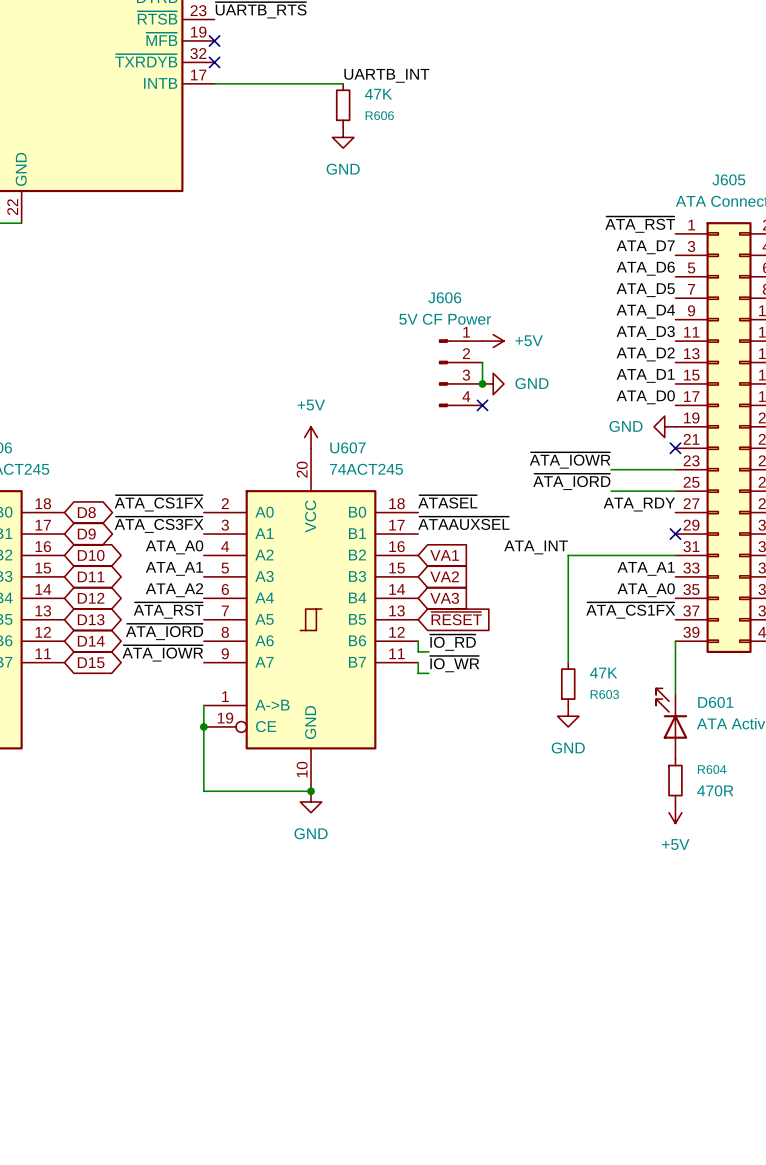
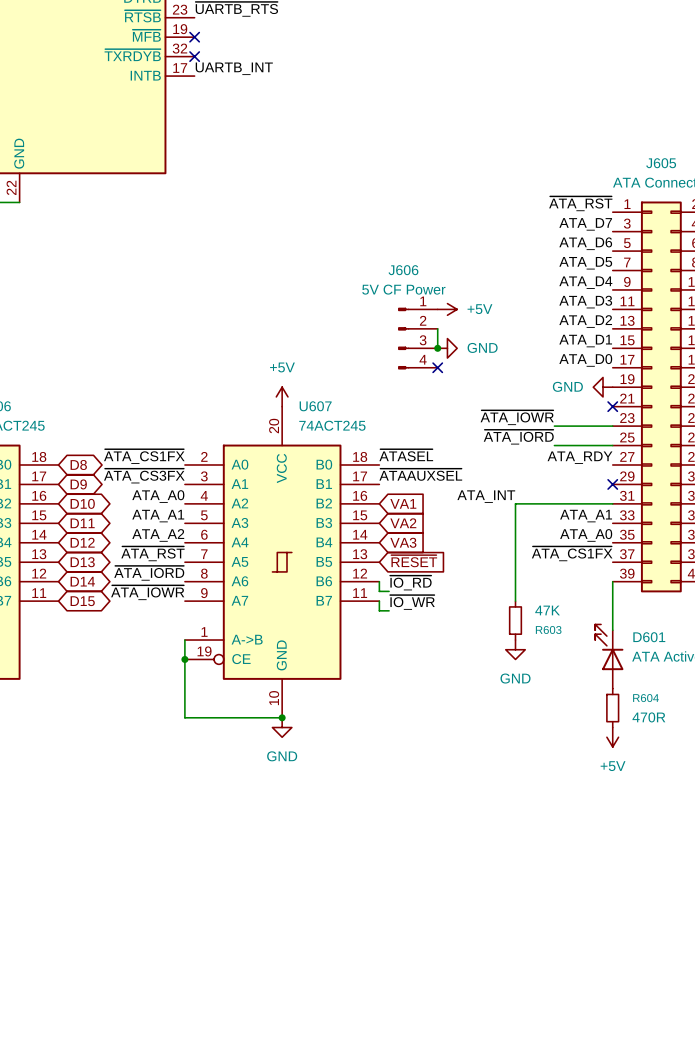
label position: UARTB_INT (386, 75) -> UARTB_INT (234, 68)
wire: (214, 83) (343, 83) -> none
R606: 47K (343, 105) -> none
power symbol: GND (343, 137) -> none

